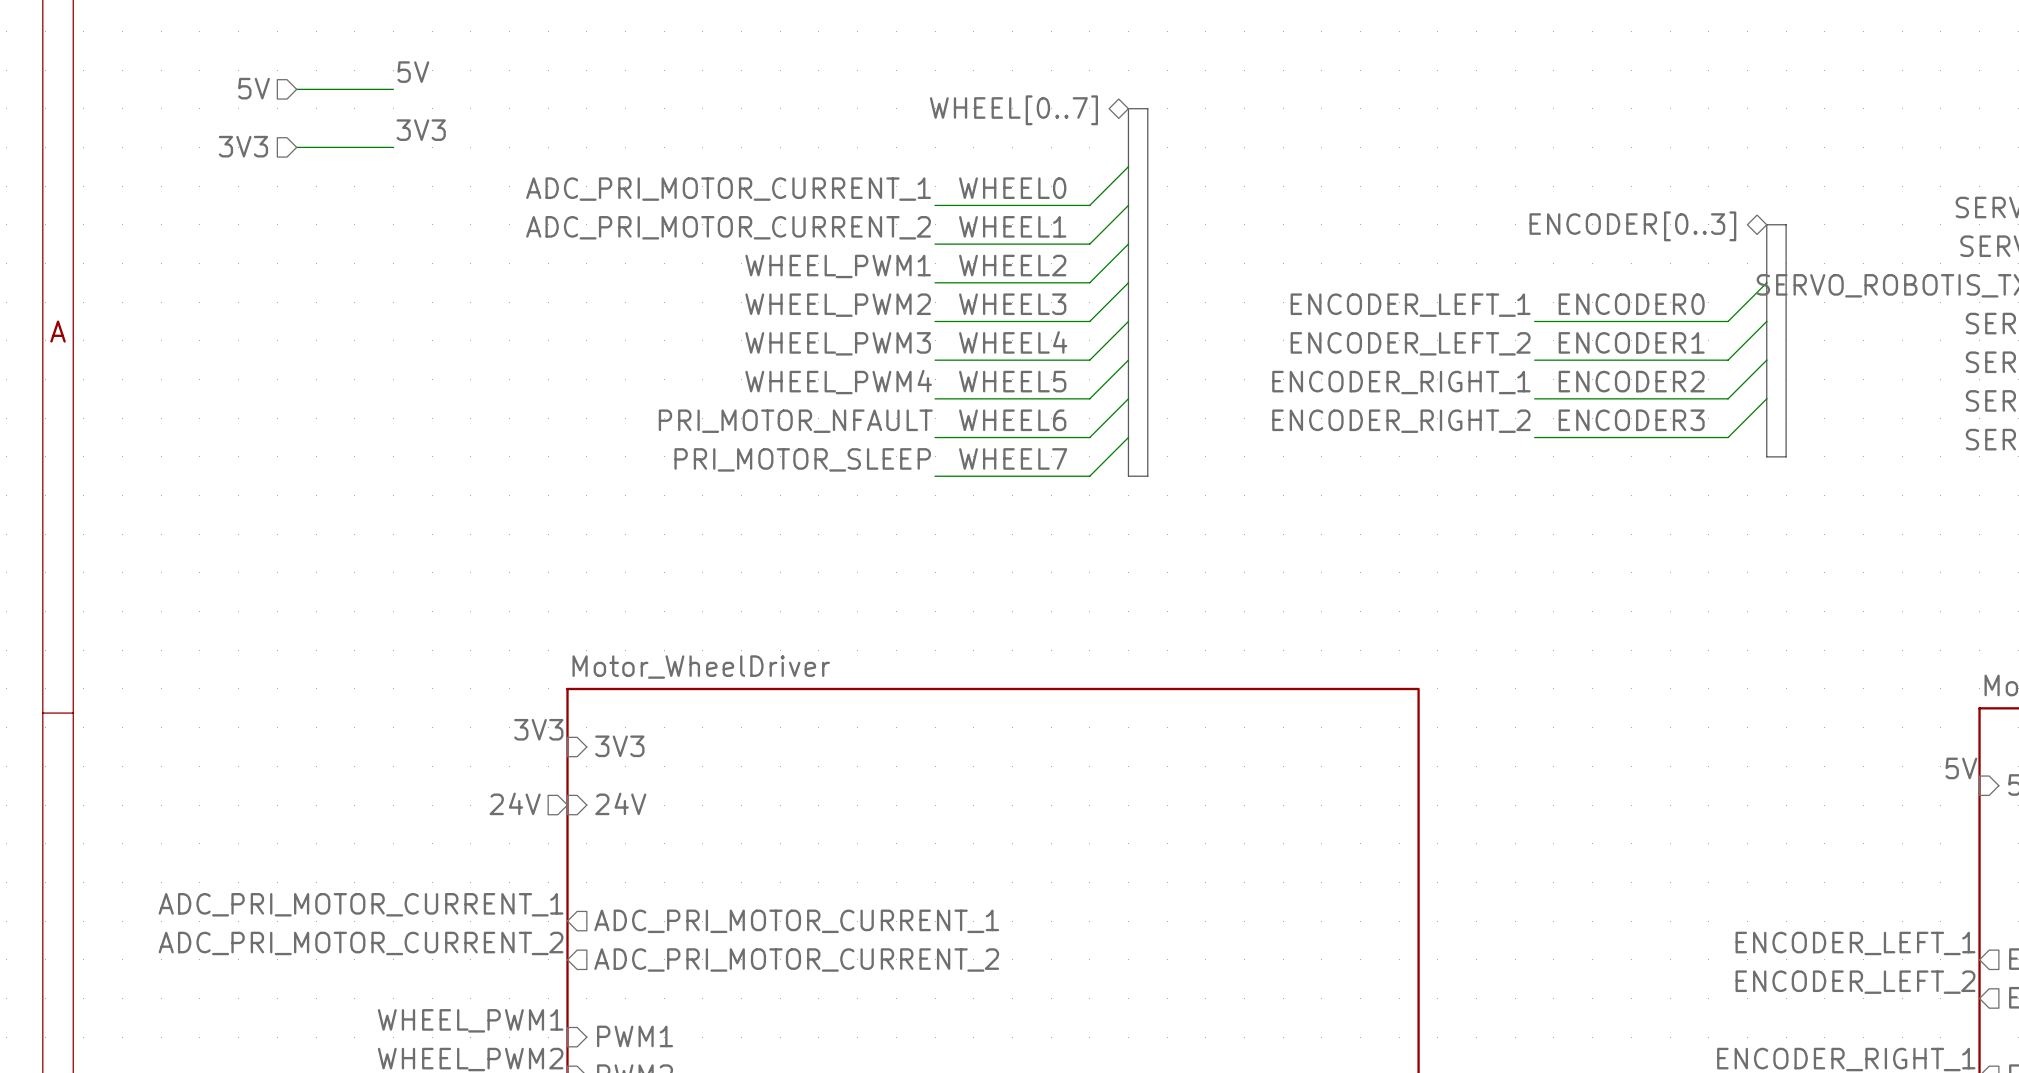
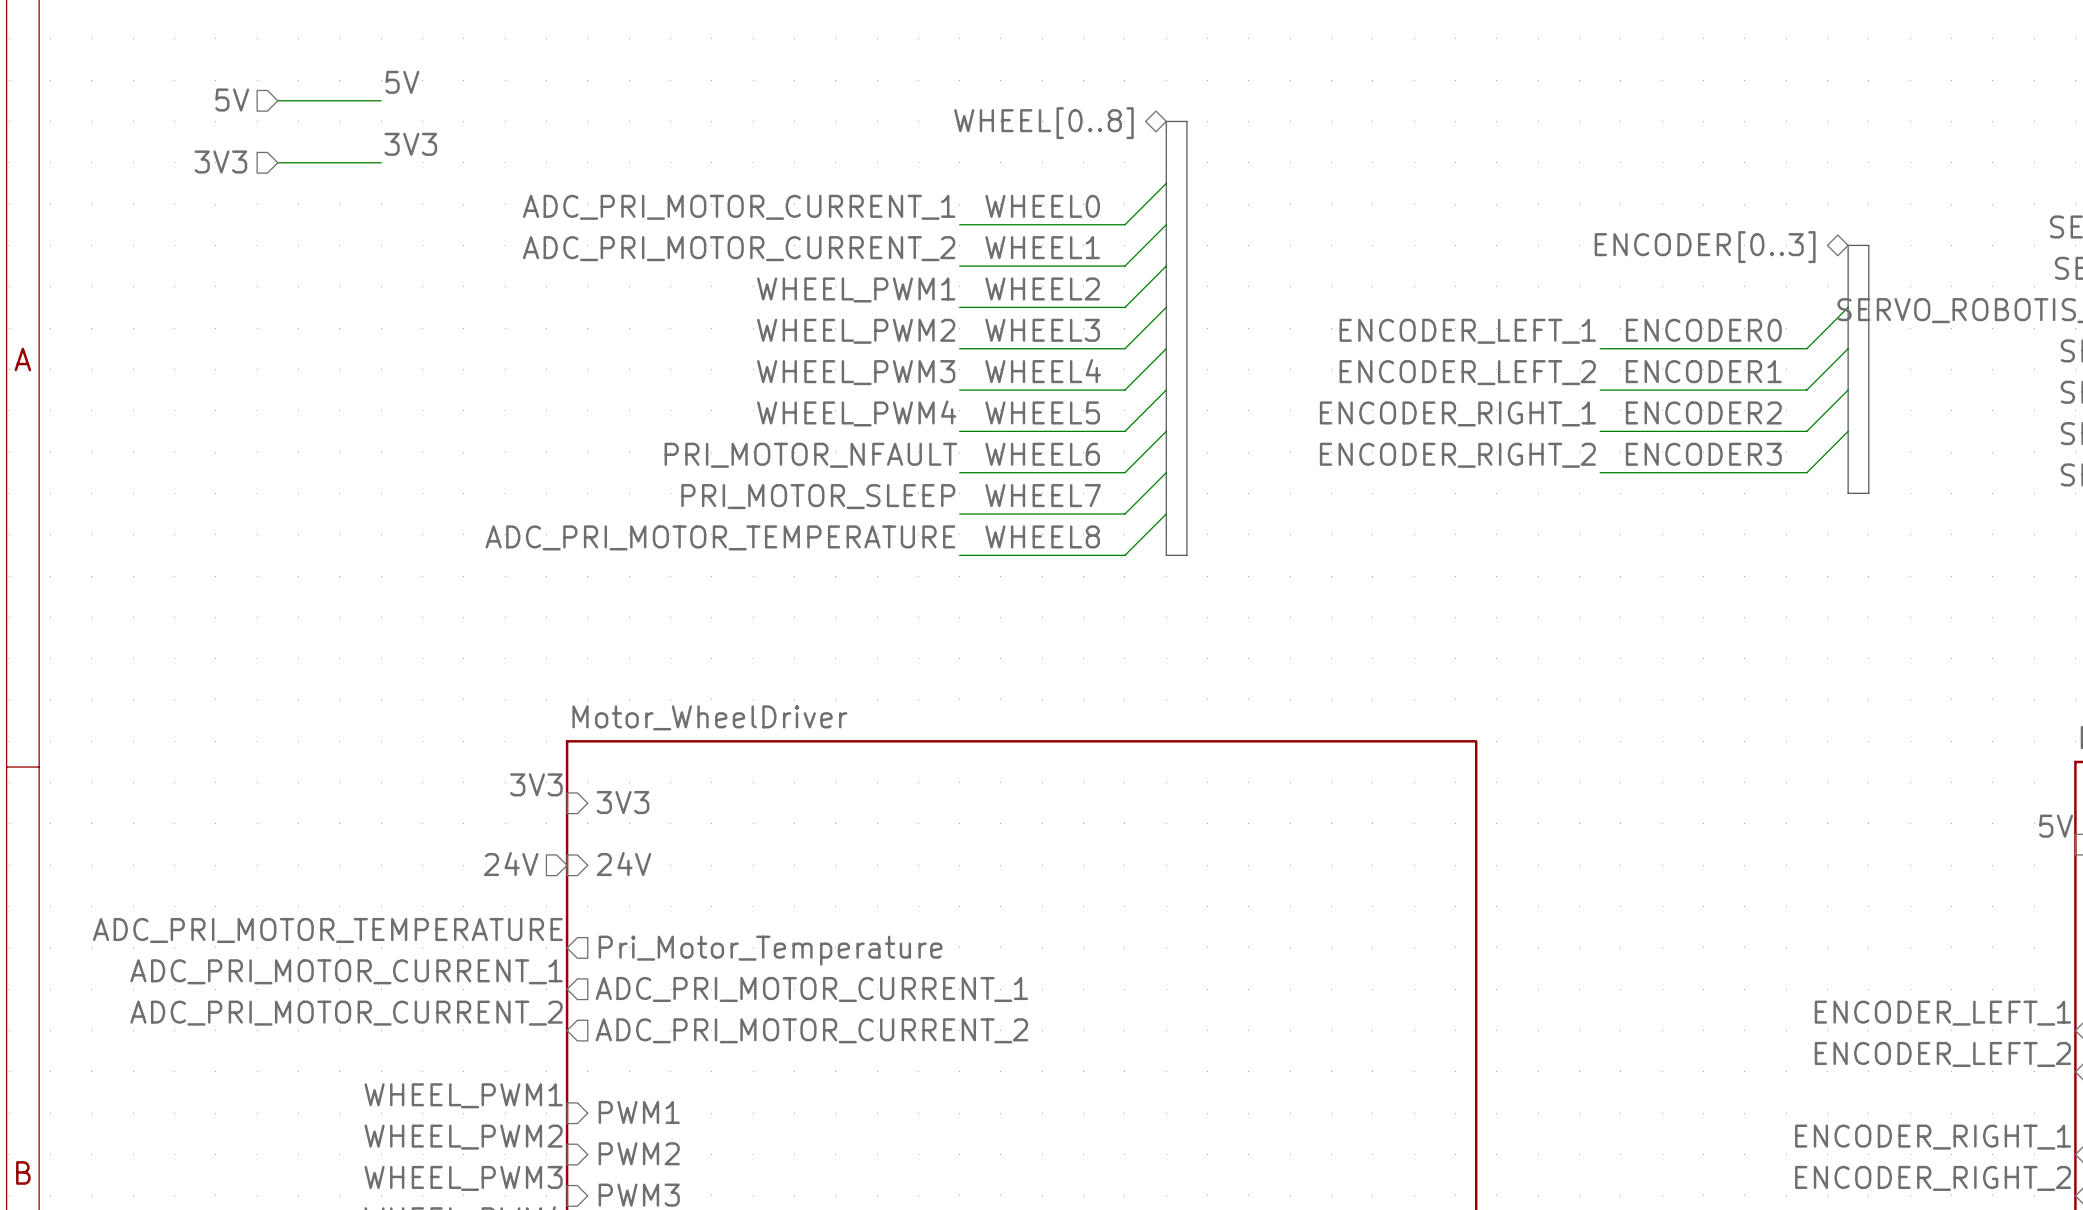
hierarchical label: WHEEL[0..7] (1013, 110) -> WHEEL[0..8] (1043, 123)
wire: none -> (1166, 514) (1124, 555) (959, 555)
bus: (1128, 476) (1147, 476) -> (1166, 514) (1166, 555) (1186, 555) (1186, 514)
label: none -> WHEEL8 (1042, 536)
label: none -> ADC_PRI_MOTOR_TEMPERATURE (720, 537)
label: none -> ADC_PRI_MOTOR_TEMPERATURE (327, 930)
sheet pin: none -> Pri_Motor_Temperature (770, 950)

